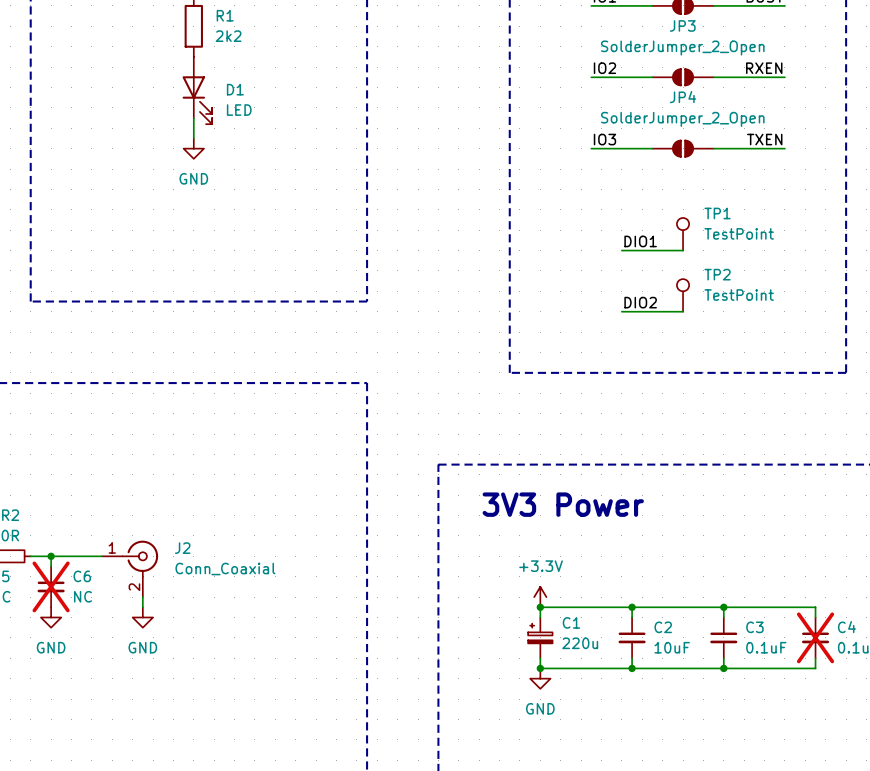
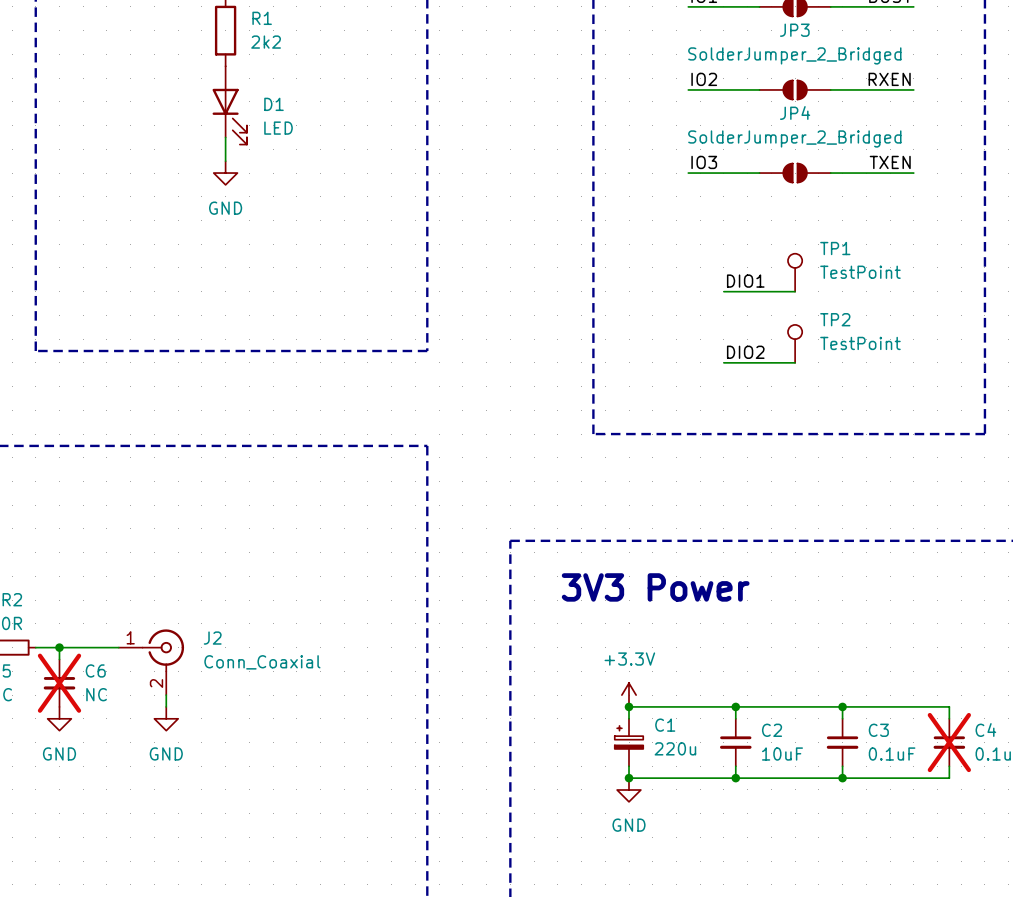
JP3 value: SolderJumper_2_Open (682, 48) -> SolderJumper_2_Bridged (794, 55)
JP4 value: SolderJumper_2_Open (682, 119) -> SolderJumper_2_Bridged (794, 138)

